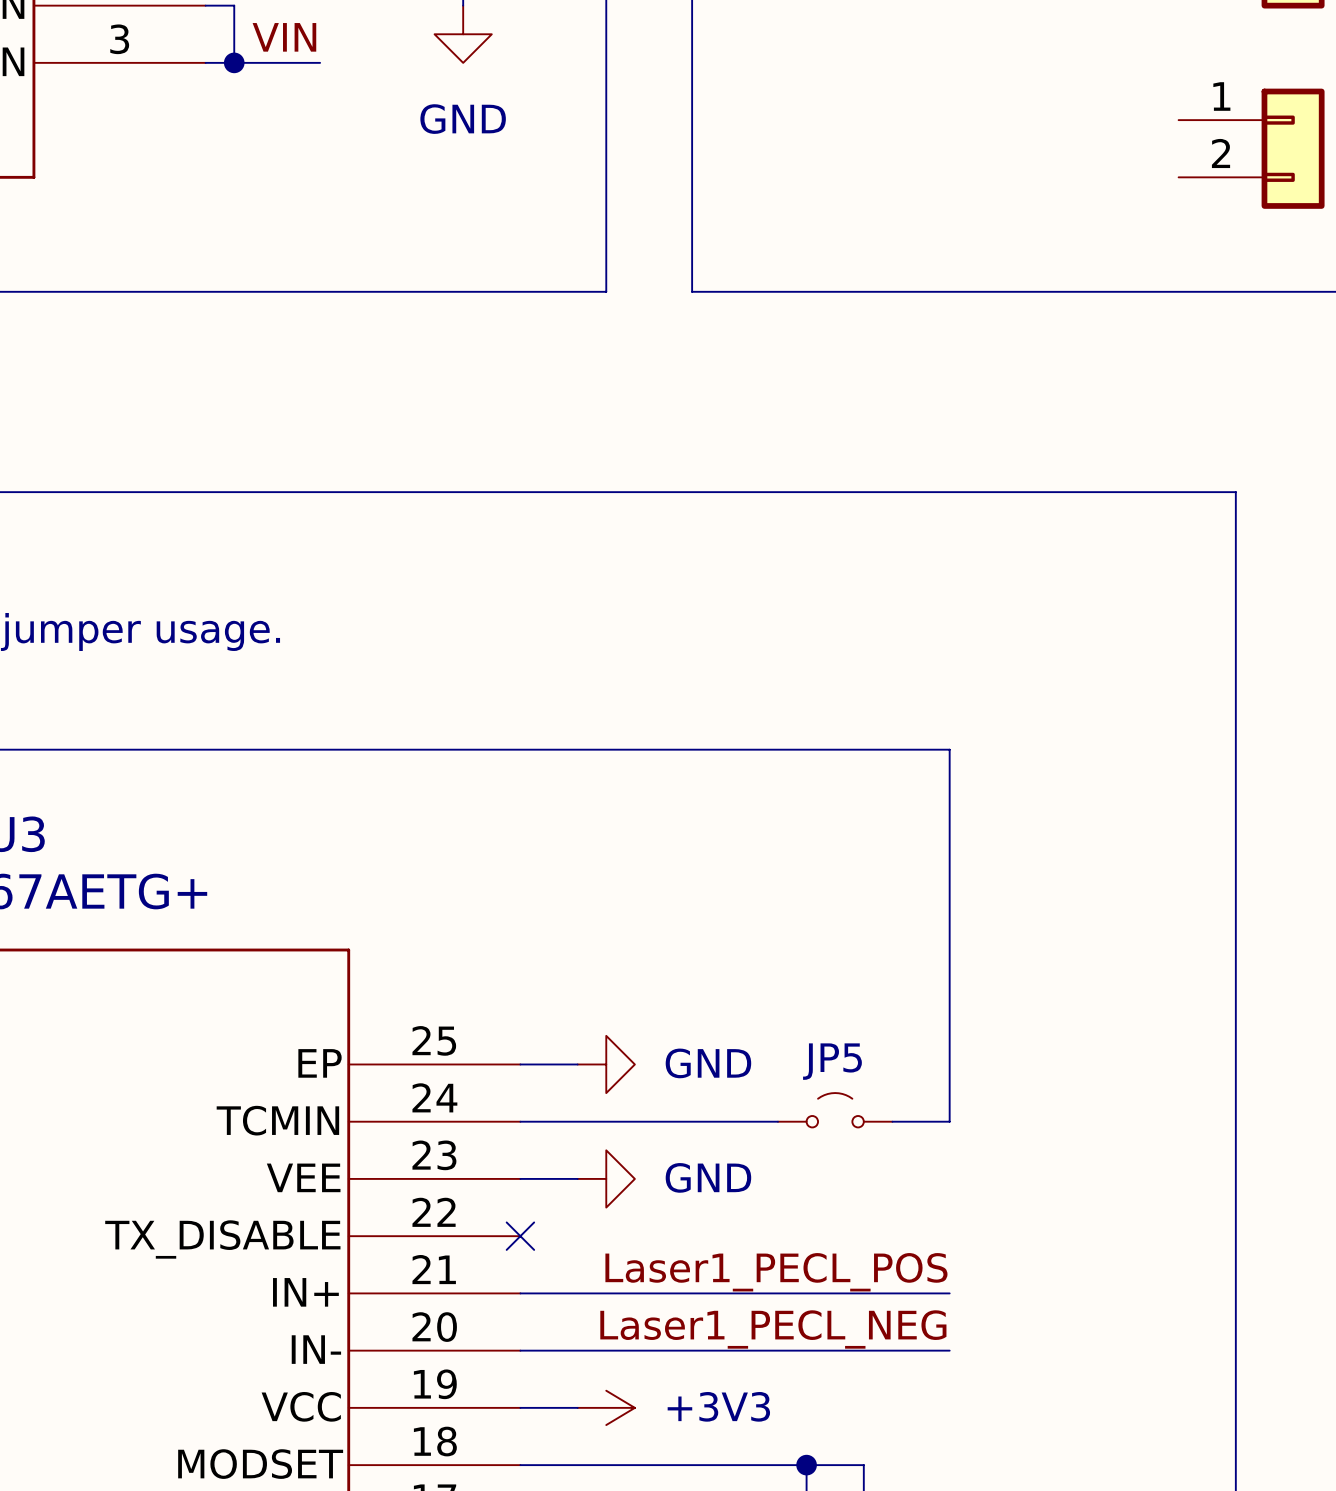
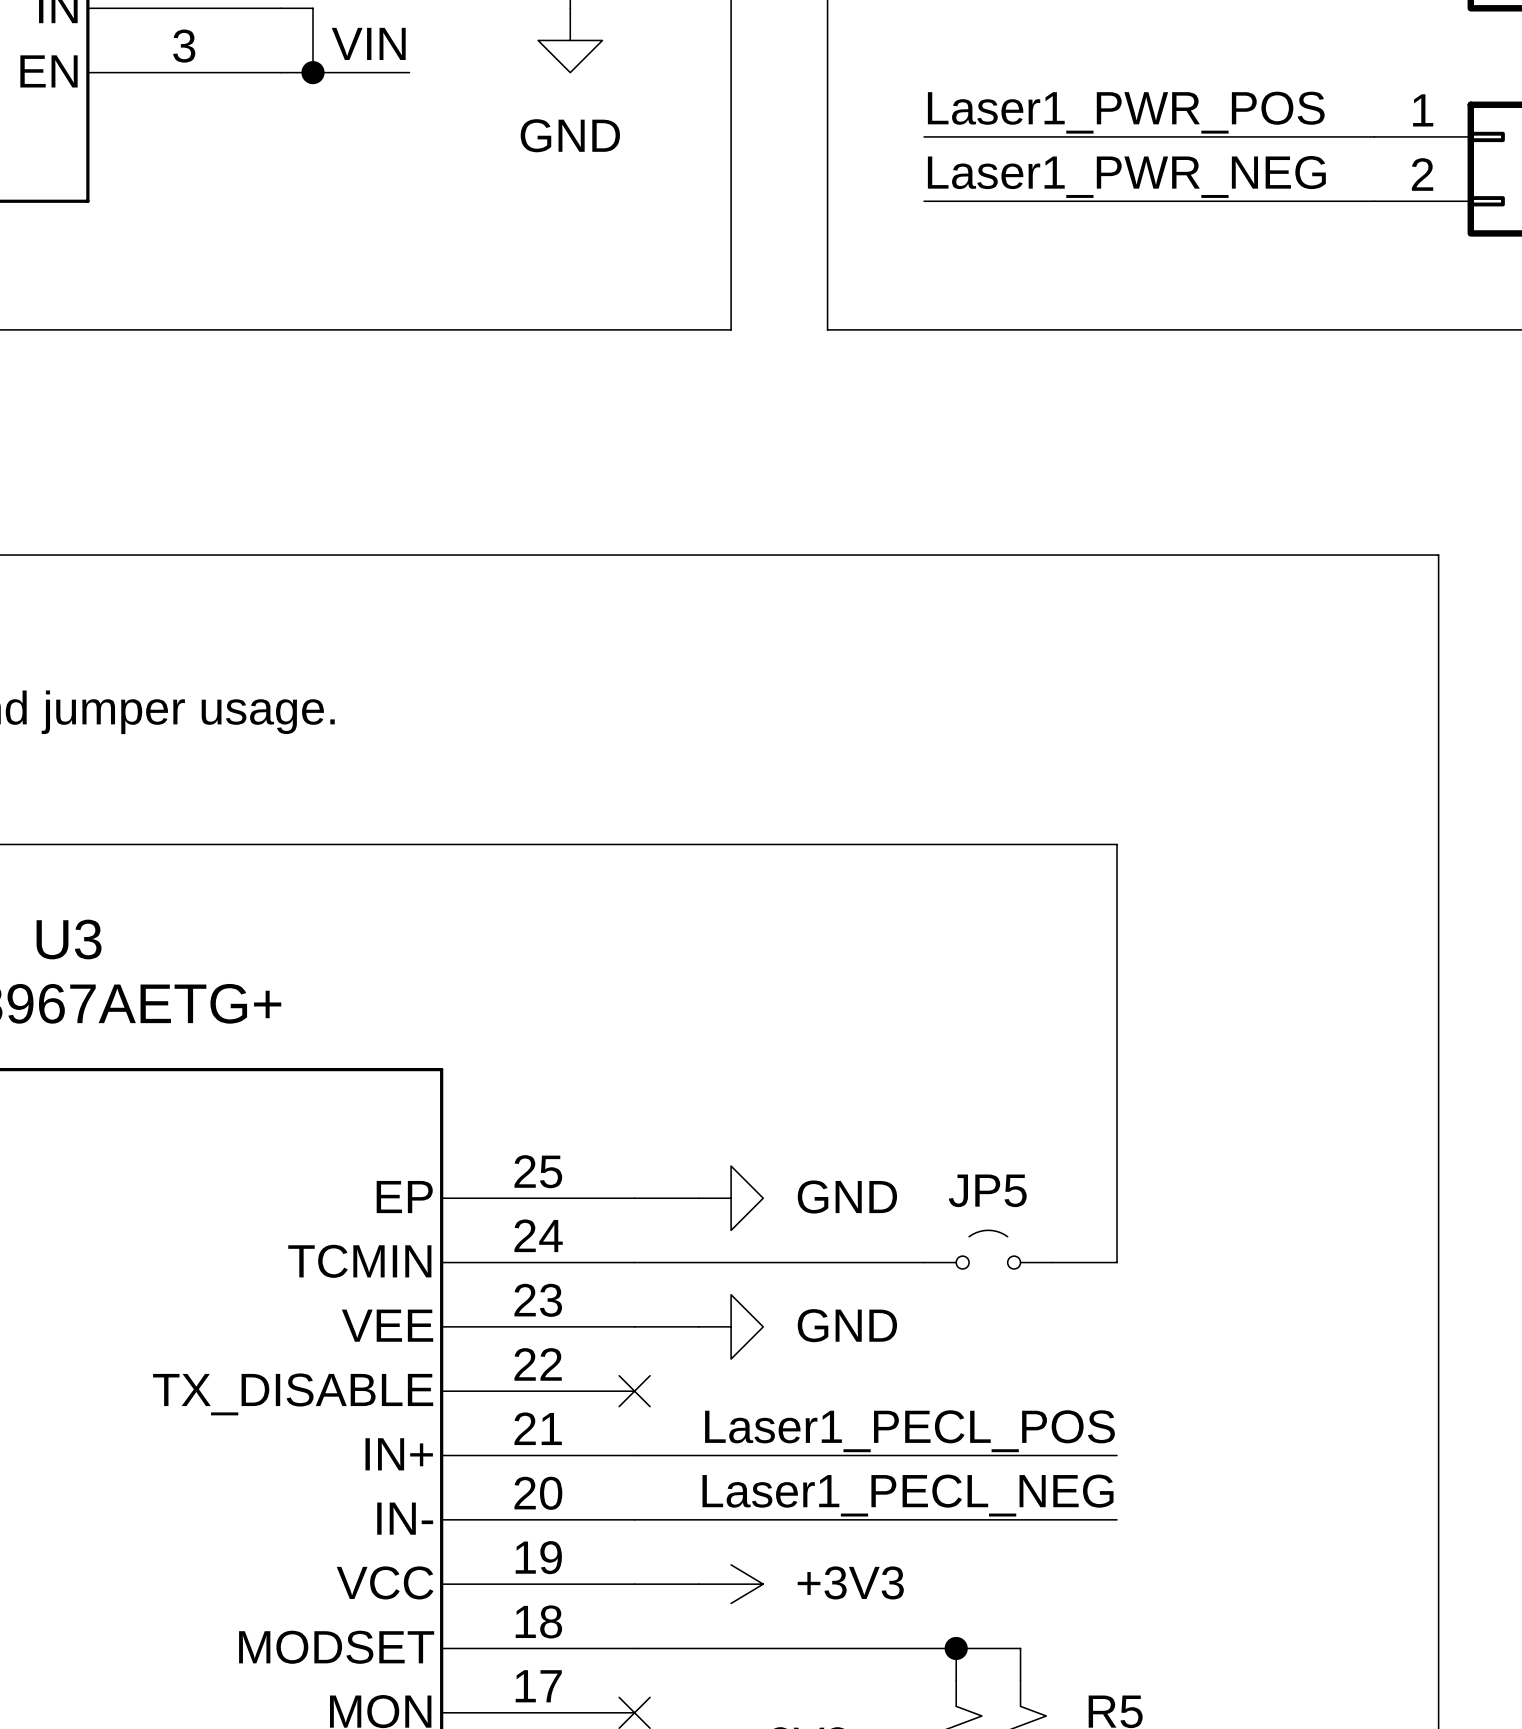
label: none -> Laser1_PWR_POS (1126, 112)
wire: none -> (924, 136) (1374, 136)
label: none -> Laser1_PWR_NEG (1126, 176)
wire: none -> (924, 201) (1374, 201)

